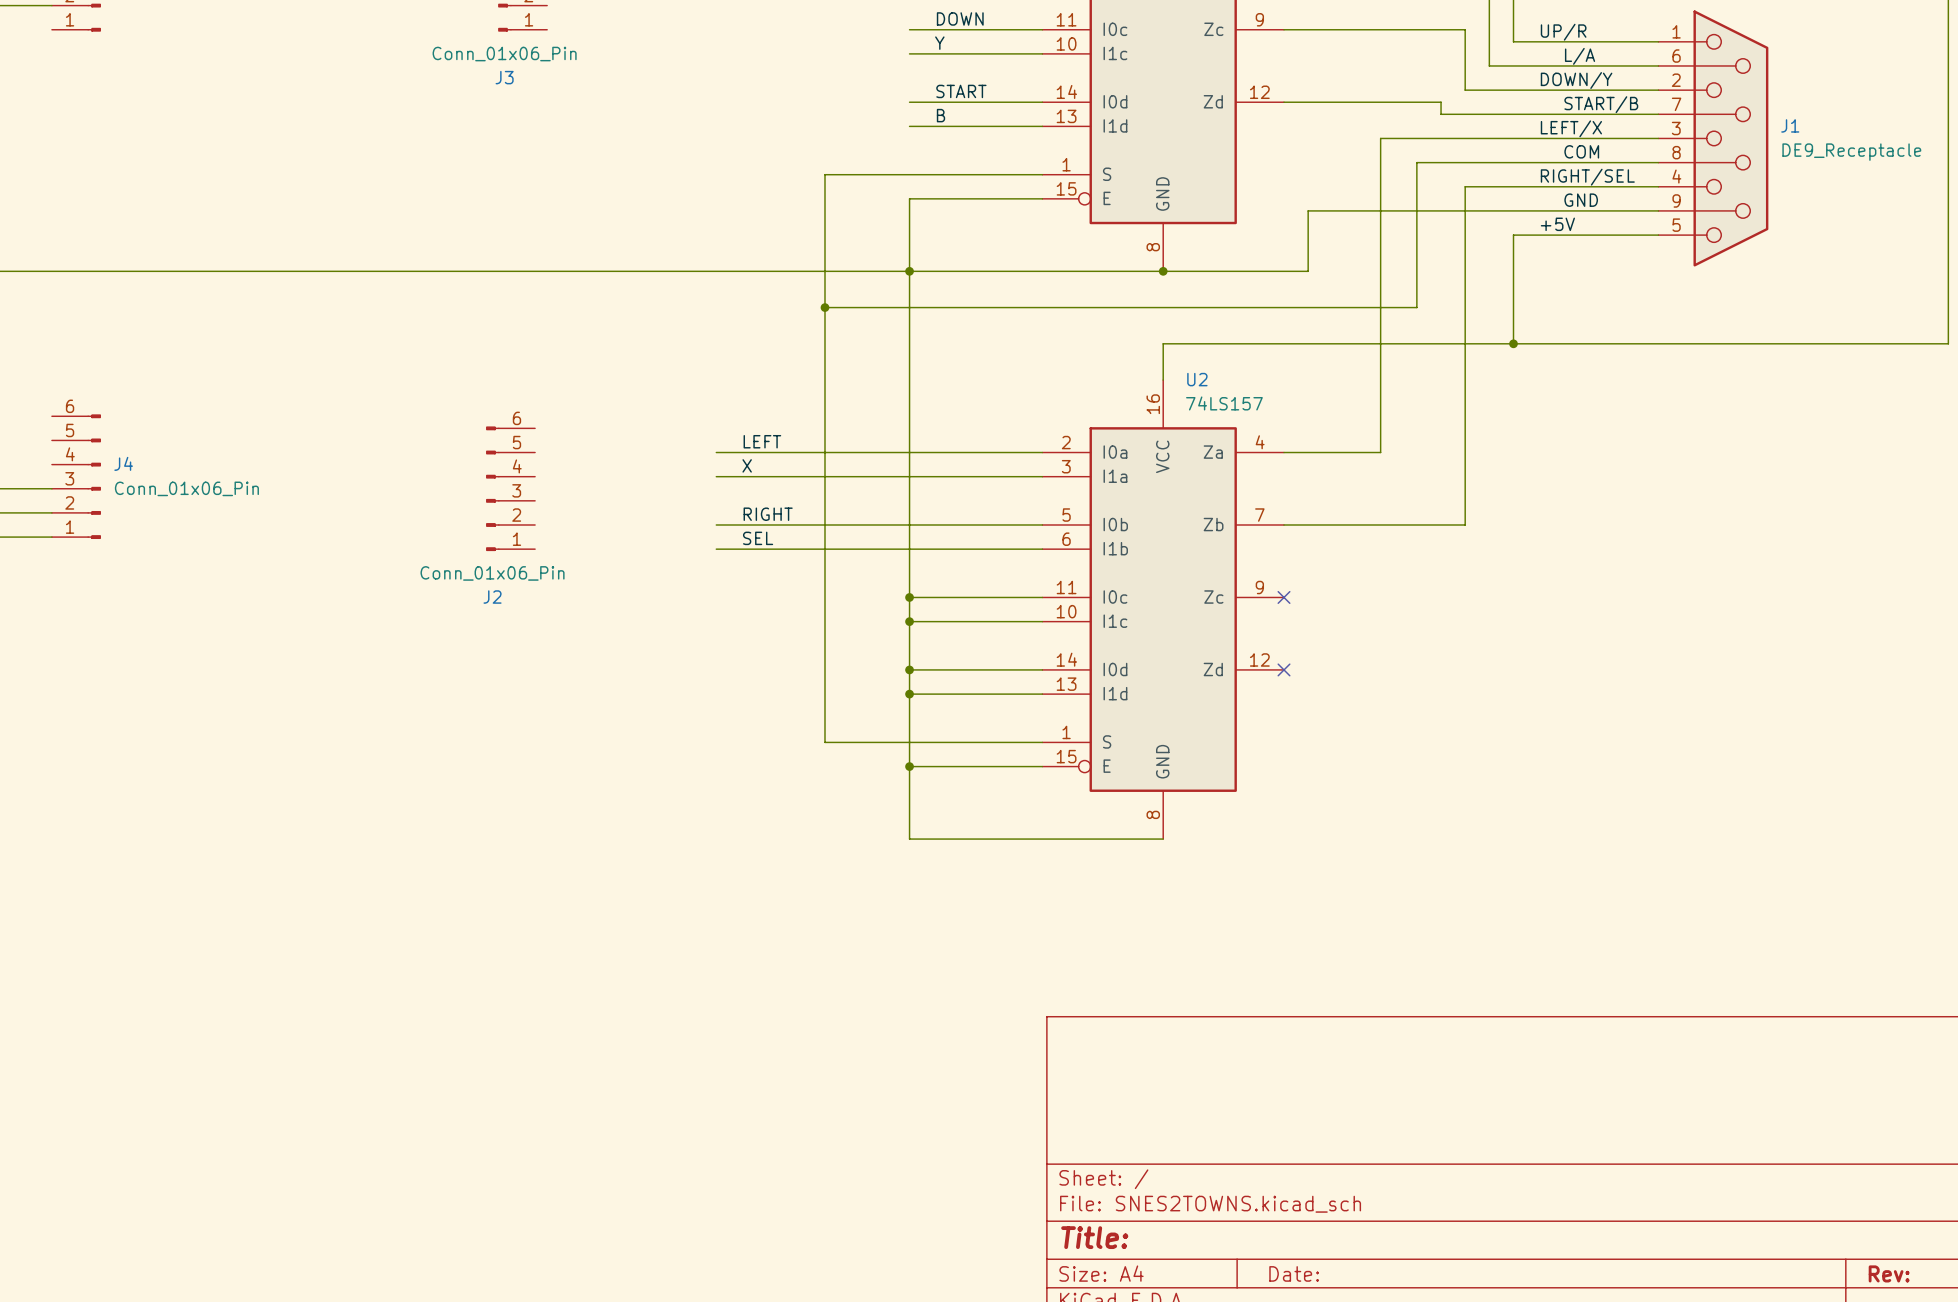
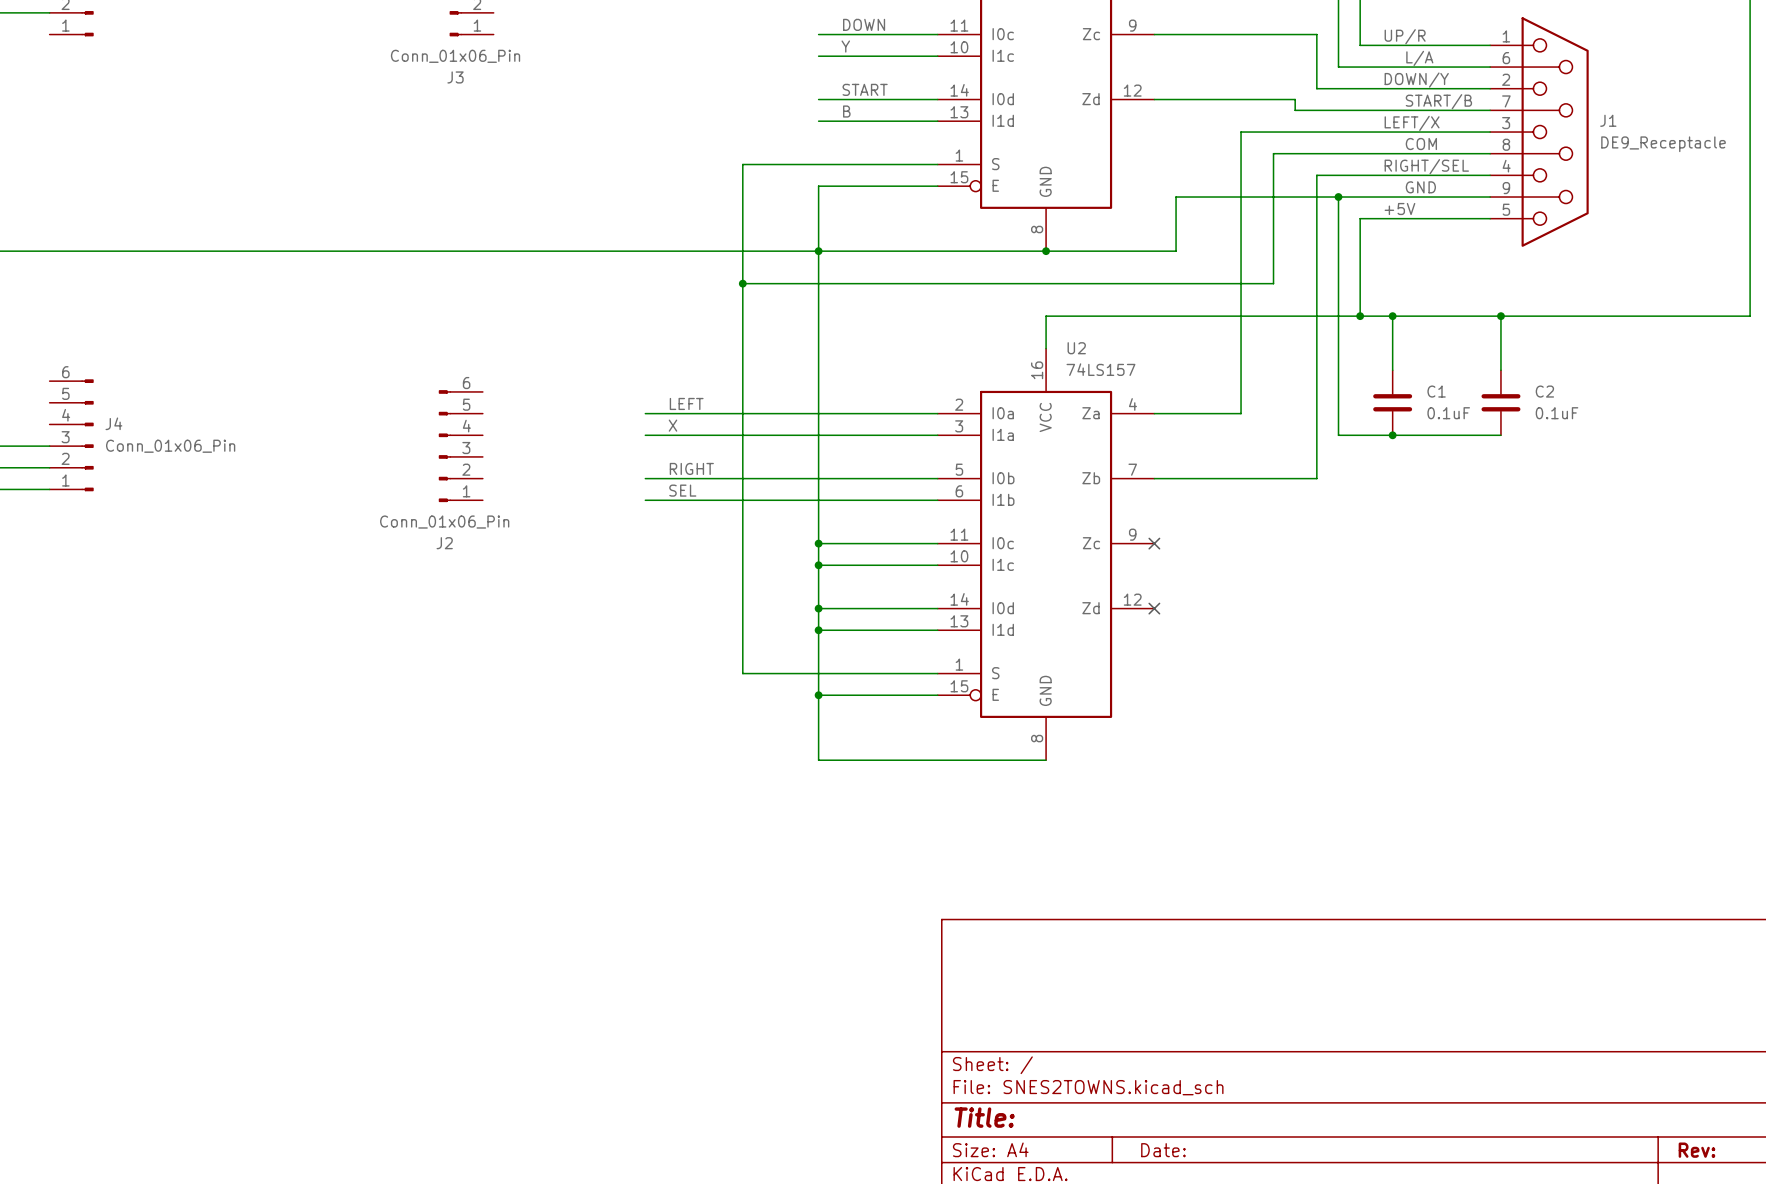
wire: none -> (1338, 197) (1338, 435) (1500, 435)
junction: none -> (1338, 197)
wire: none -> (1392, 316) (1392, 370)
junction: none -> (1392, 316)
wire: none -> (1500, 316) (1500, 370)
junction: none -> (1500, 316)
C1: none -> 0.1uF (1392, 402)
C2: none -> 0.1uF (1500, 402)
junction: none -> (1392, 435)

